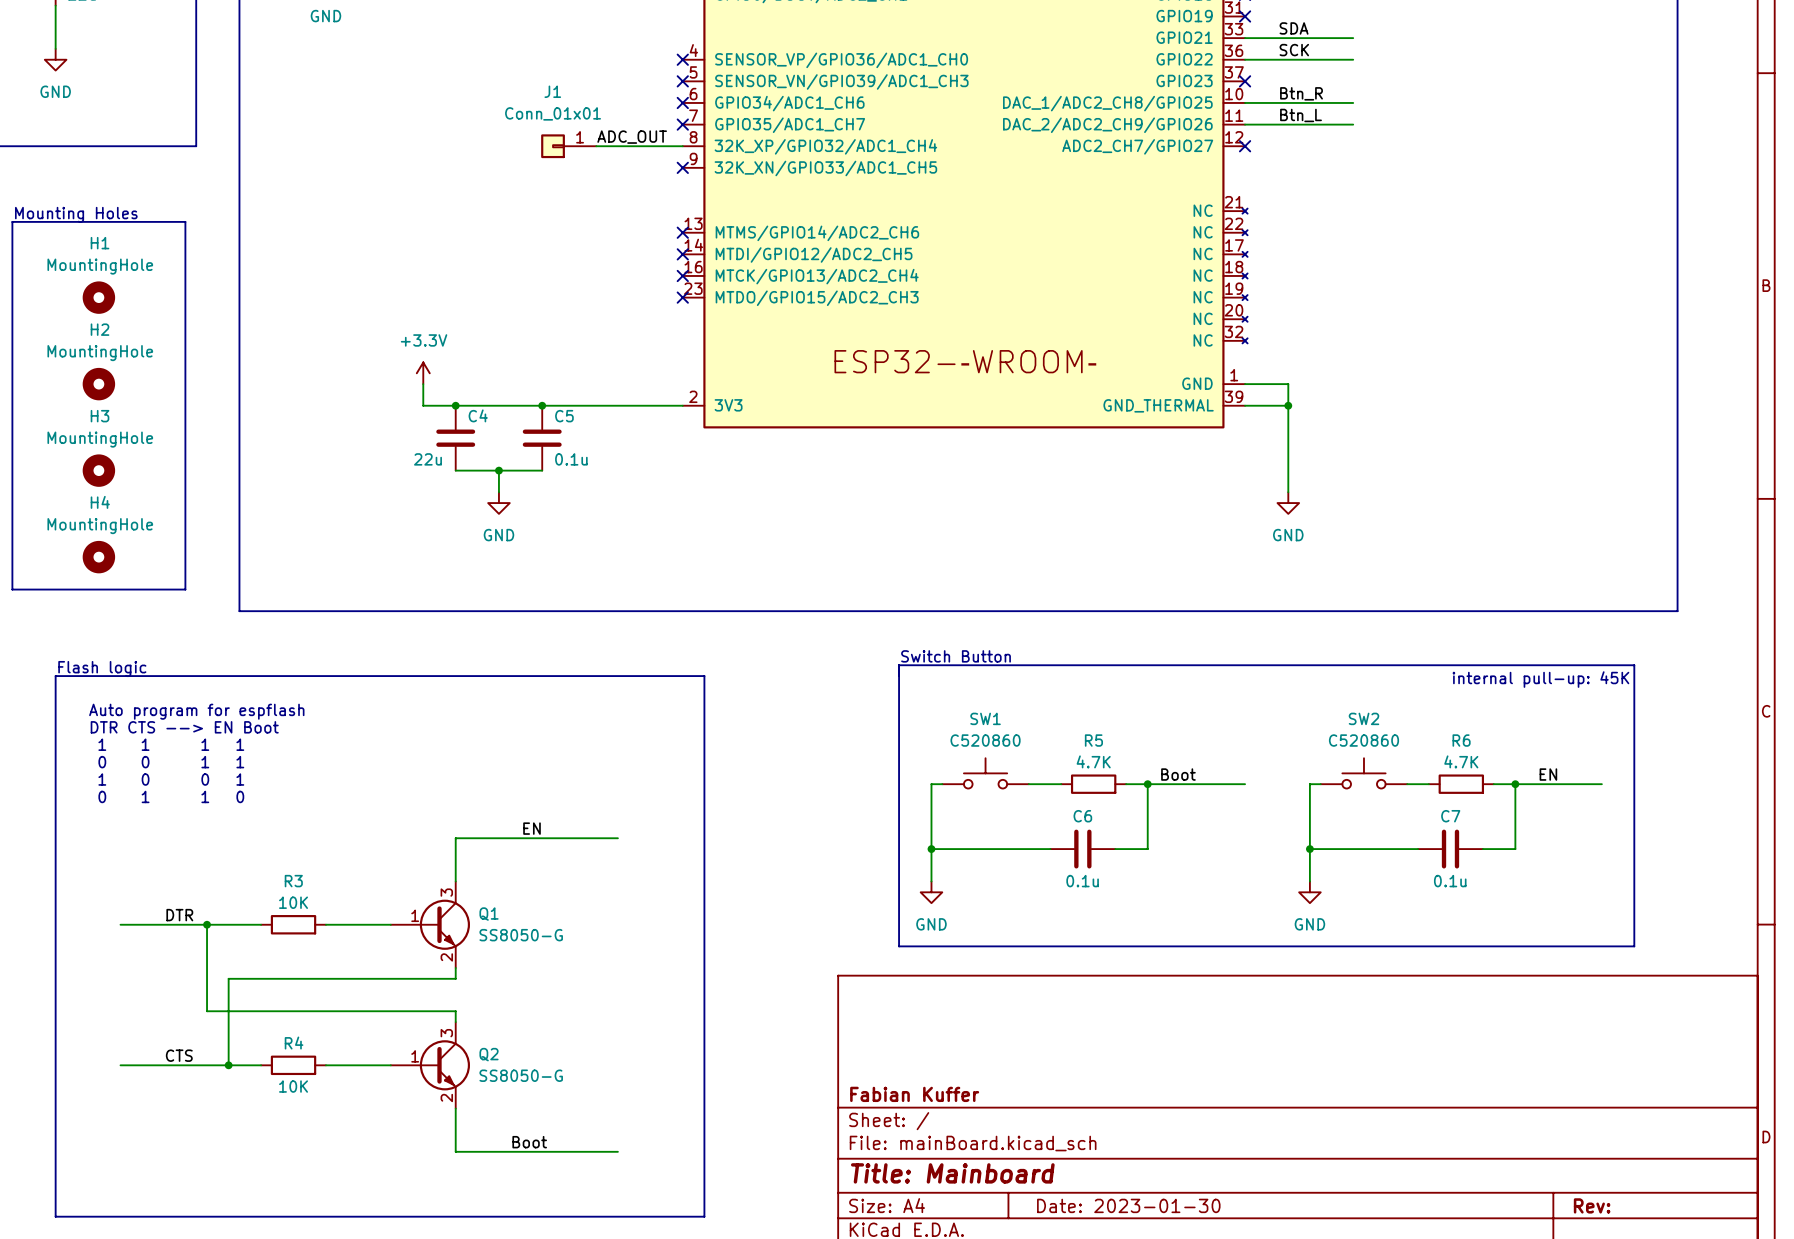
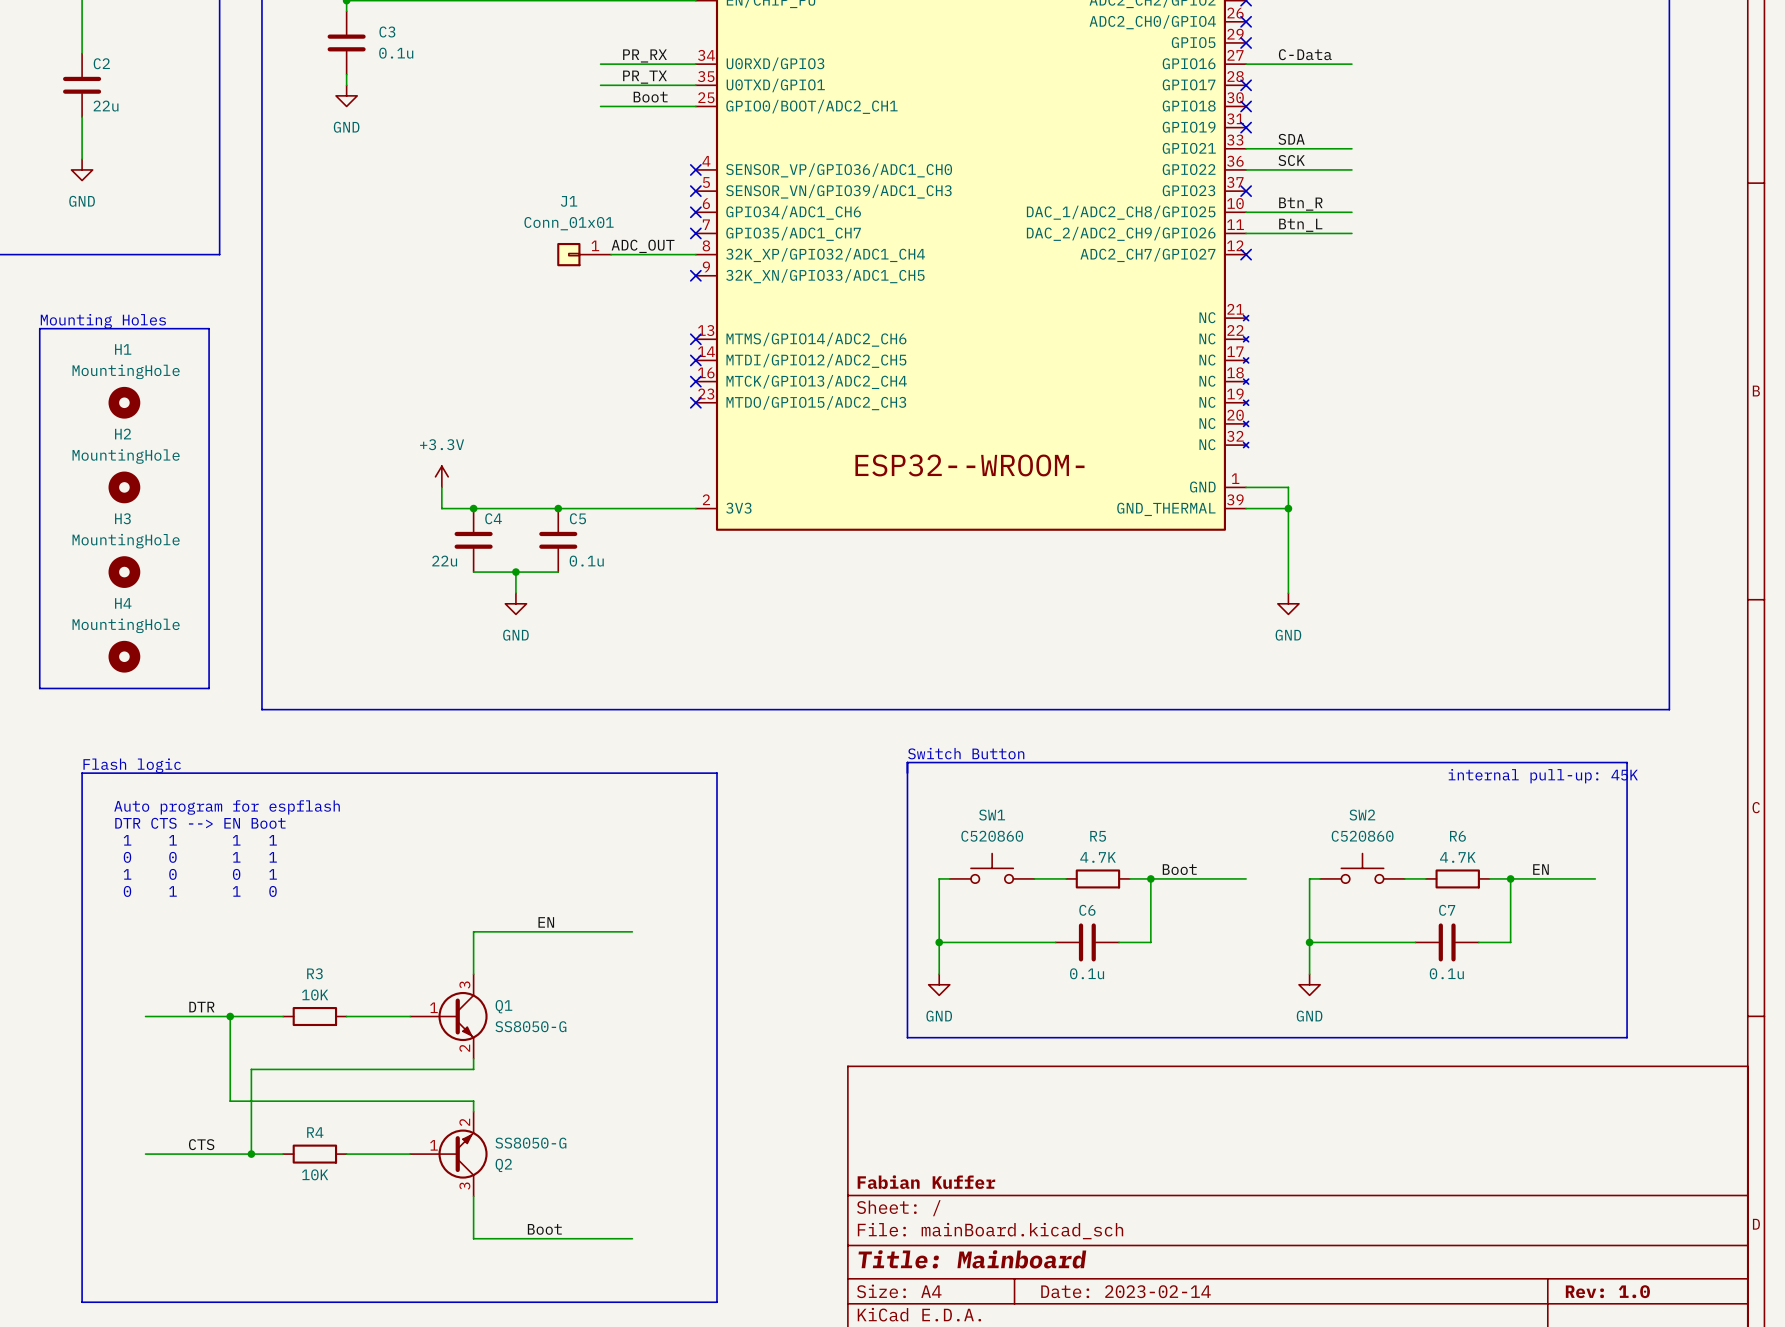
Q2 flip: as is (444, 1065) -> up-down (463, 1154)
title block: Date: 2023-01-30 (1128, 1205) -> Date: 2023-02-14 (1126, 1291)
title block: Rev: (1592, 1205) -> Rev: 1.0 (1607, 1291)

